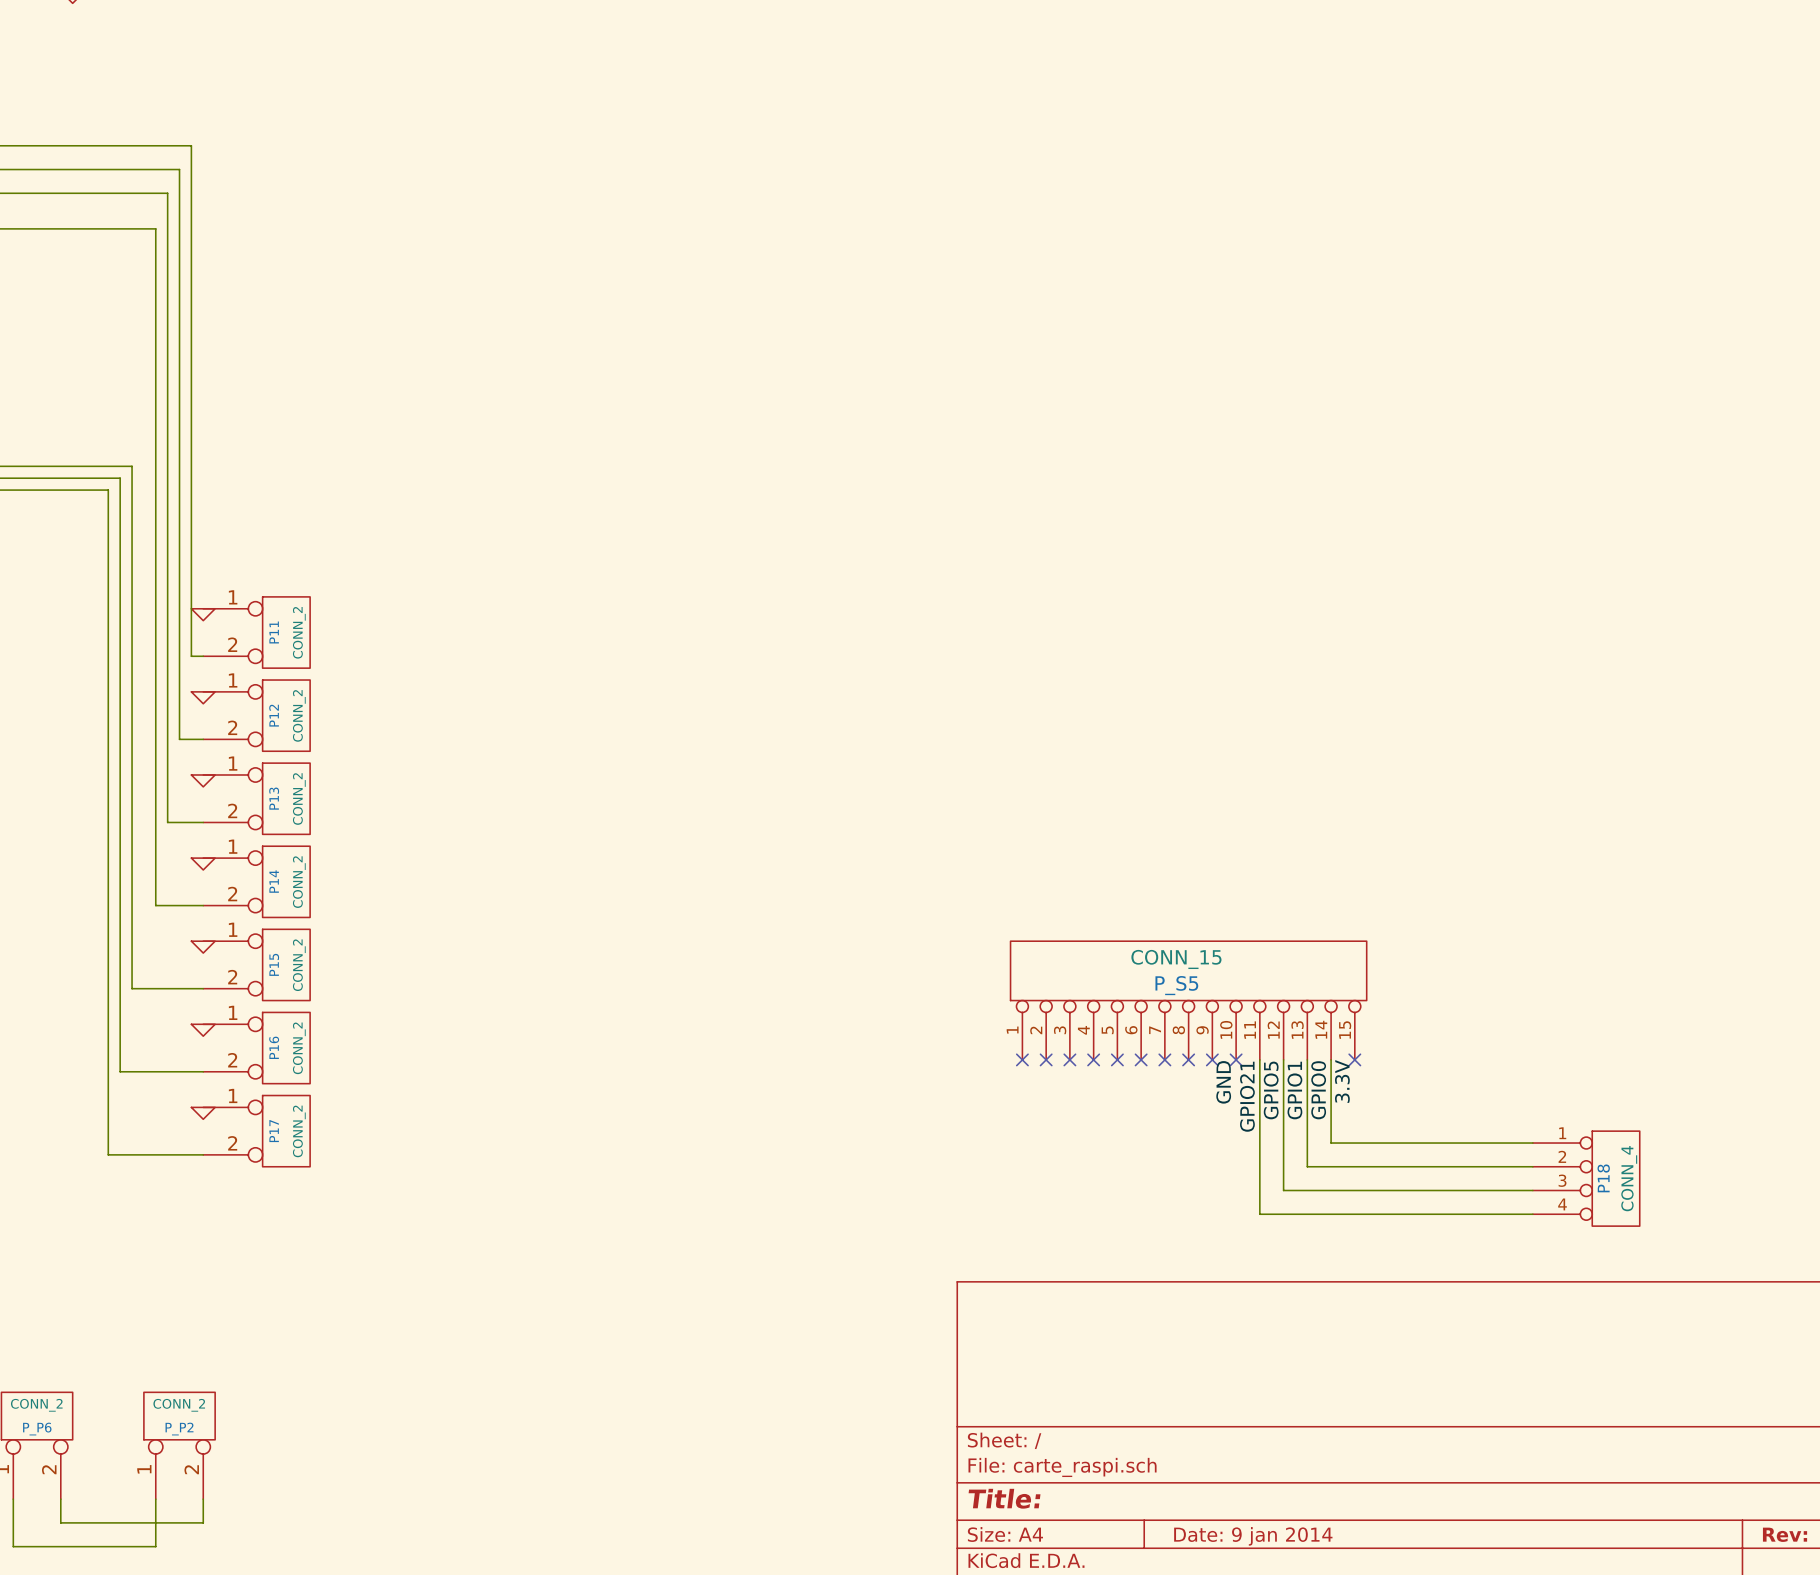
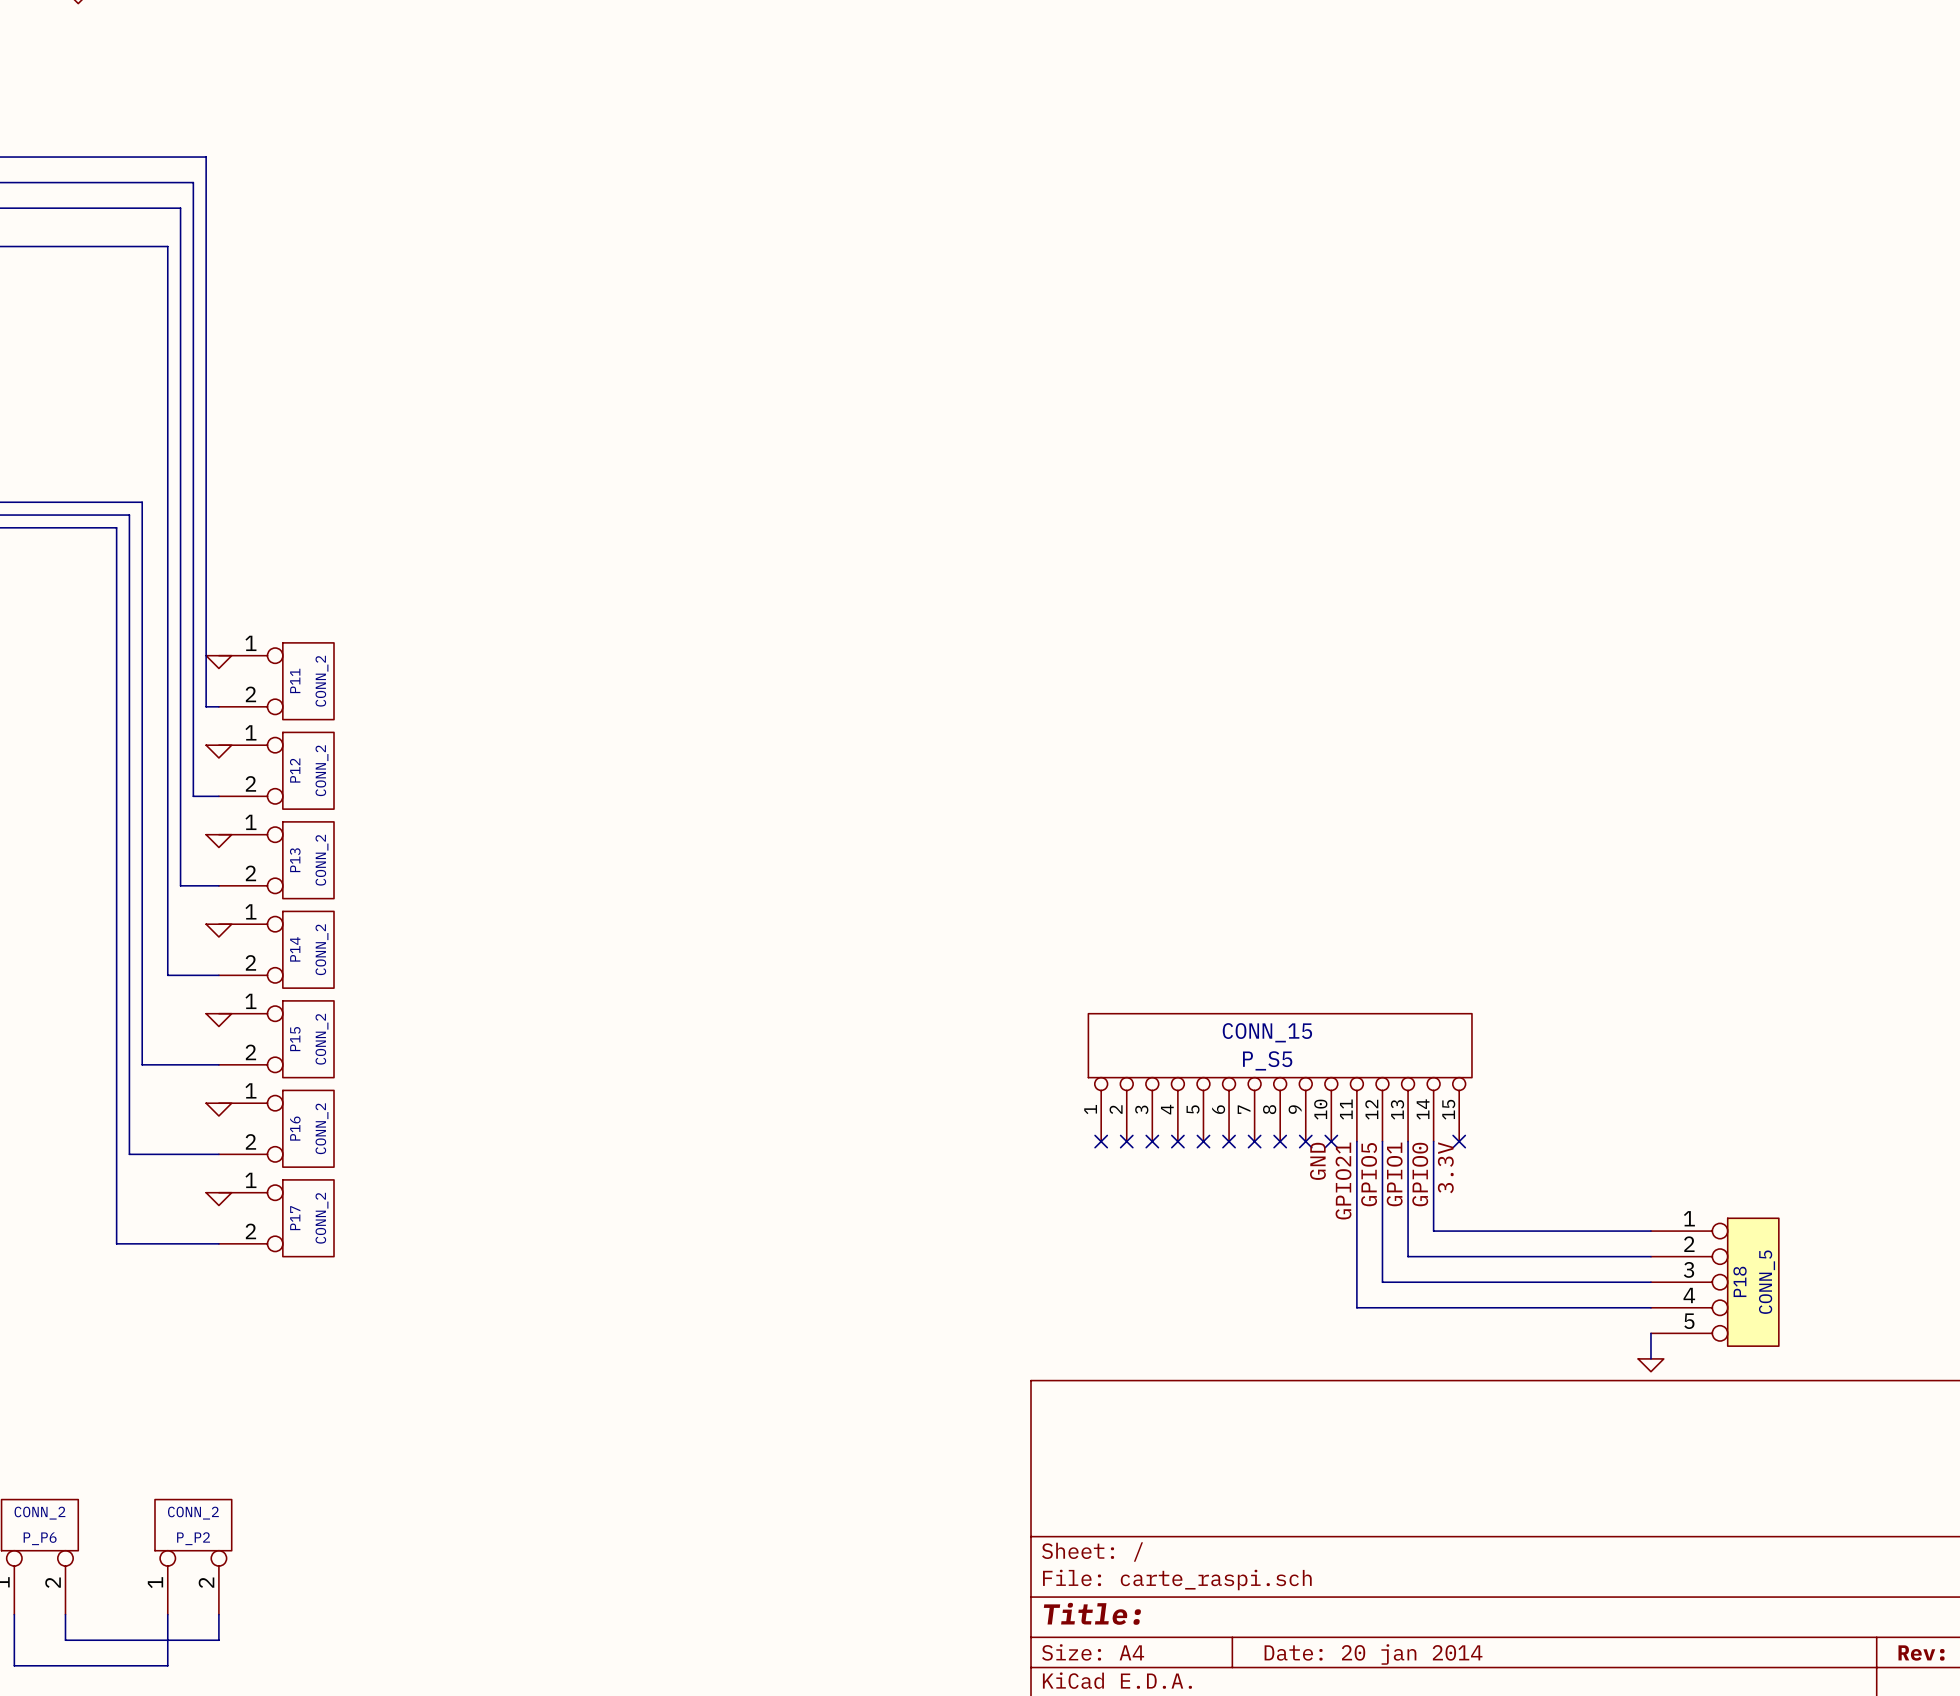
P18 symbol: [1532, 1131, 1640, 1227] -> [1650, 1218, 1779, 1347]
P18 value: CONN_4 (1629, 1178) -> CONN_5 (1767, 1282)
wire: none -> (1650, 1333) (1650, 1358)
power symbol: none -> (1650, 1365)
title block: Date: 9 jan 2014 (1253, 1536) -> Date: 20 jan 2014 (1373, 1654)

